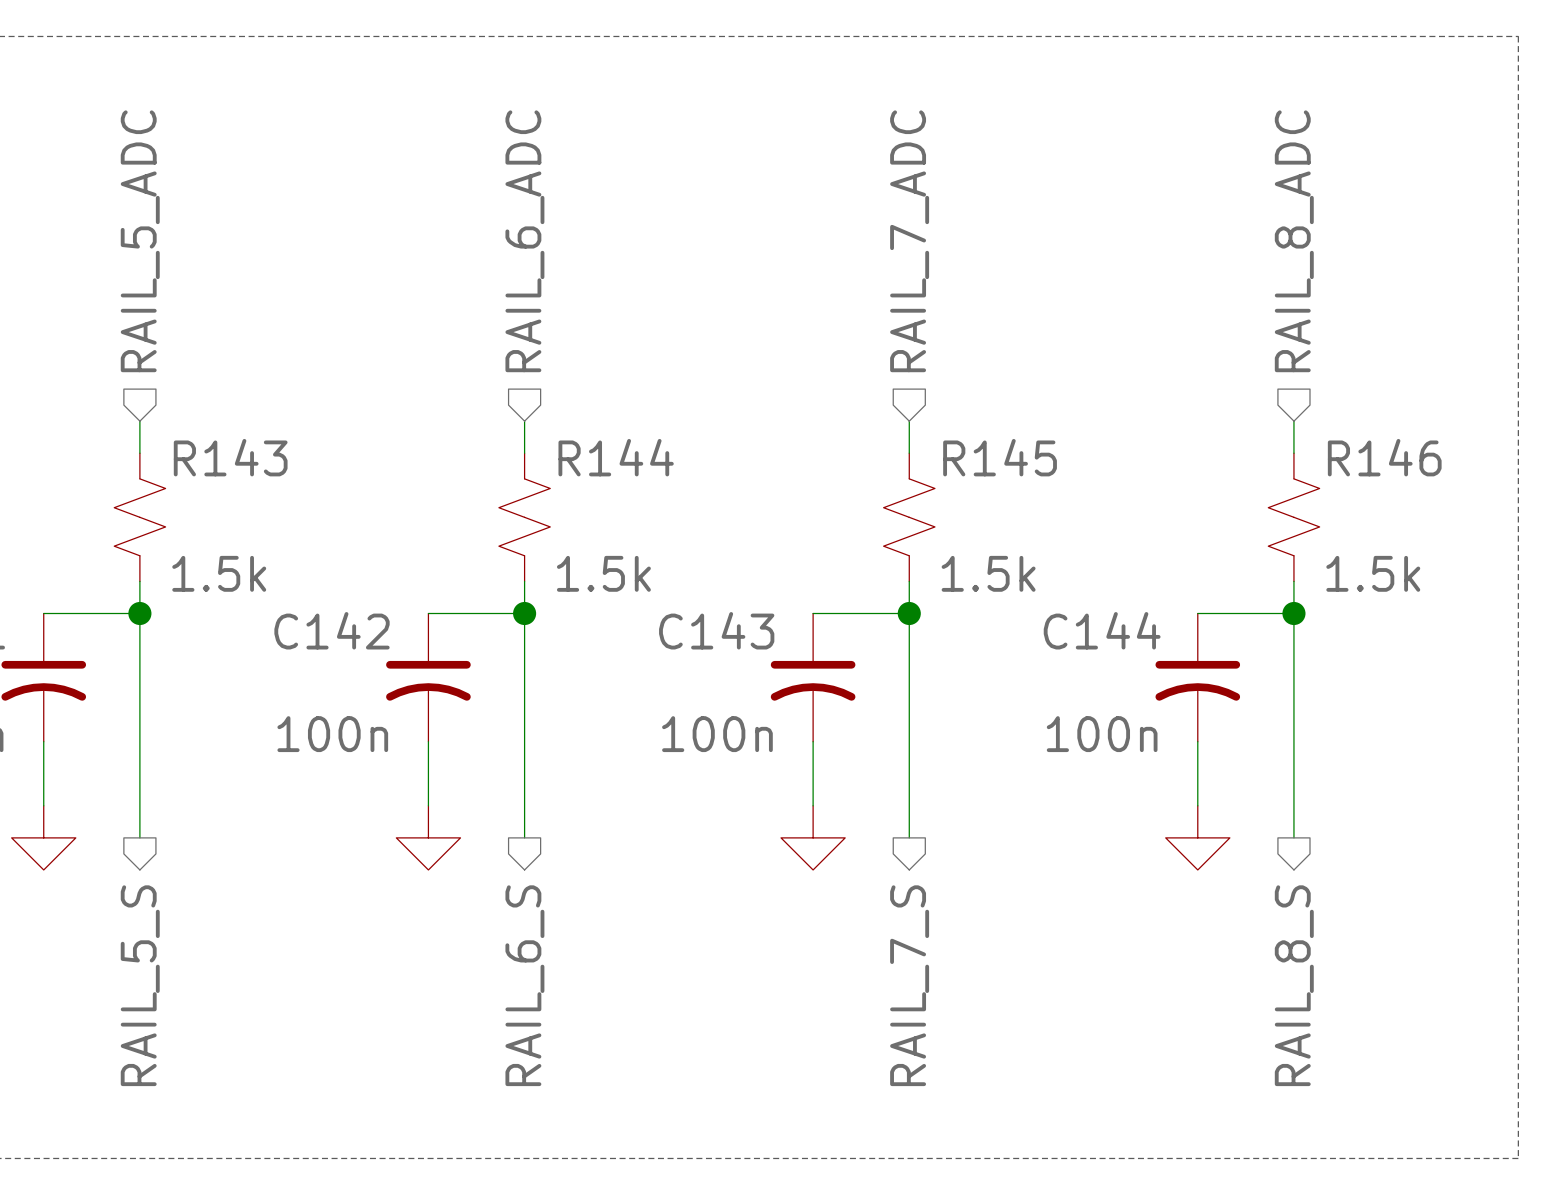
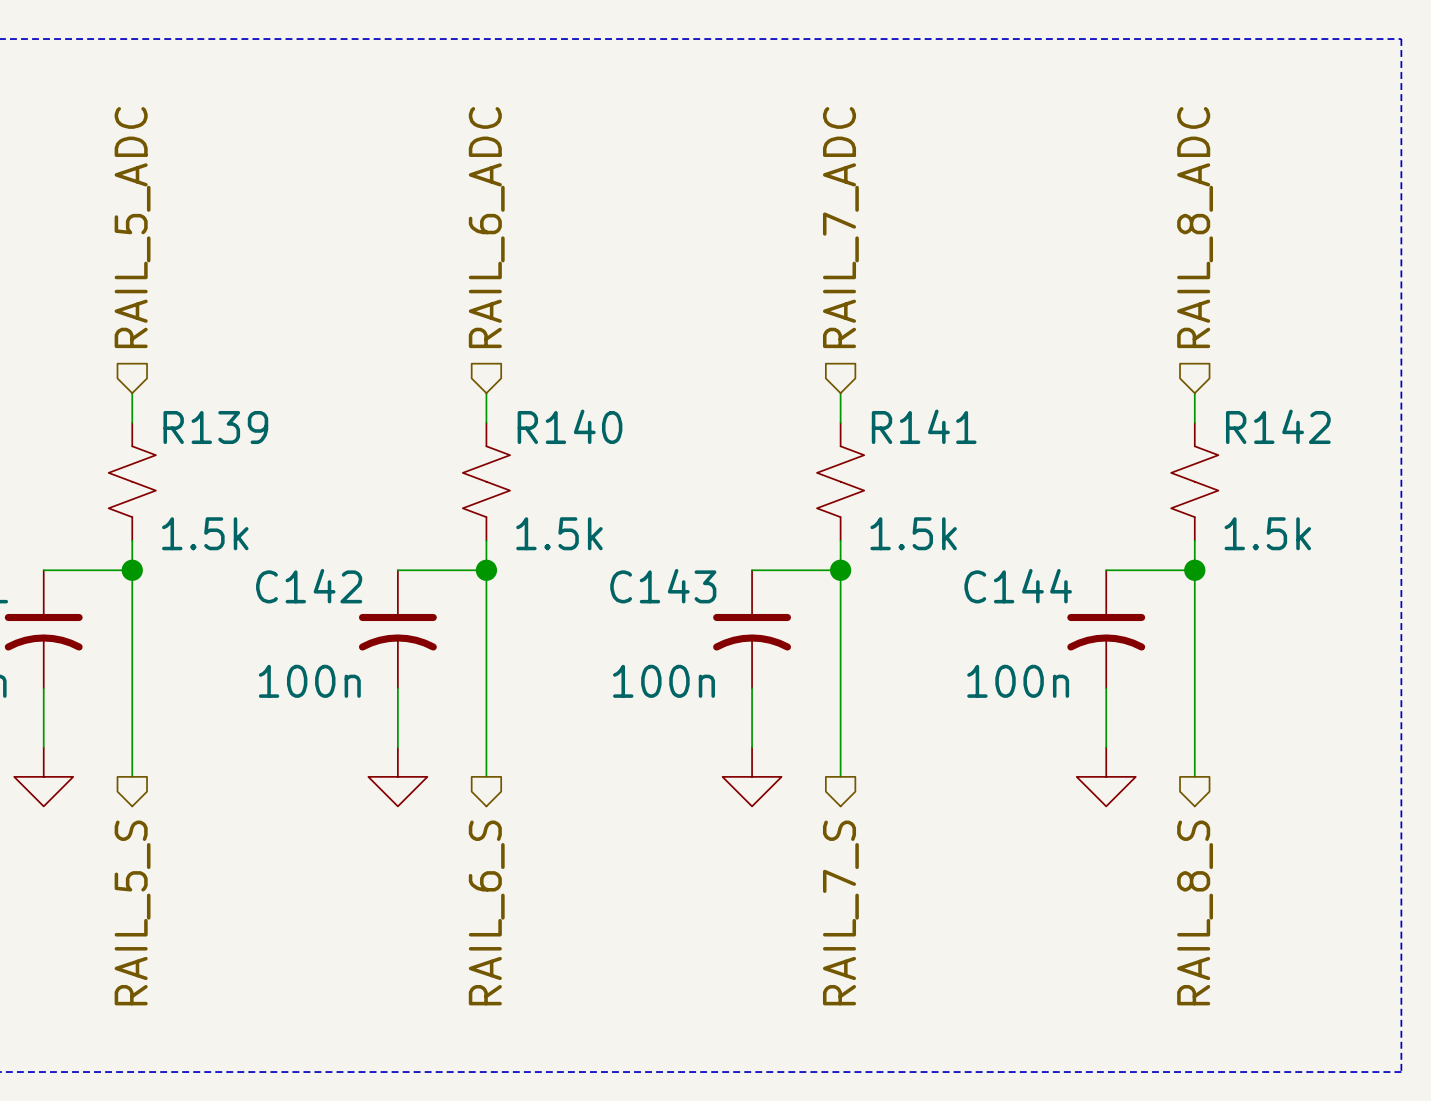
R143 name: R143 (230, 457) -> R139 (215, 427)
R144 name: R144 (616, 457) -> R140 (569, 426)
R145 name: R145 (1000, 457) -> R141 (924, 426)
R146 name: R146 (1384, 457) -> R142 (1278, 426)

